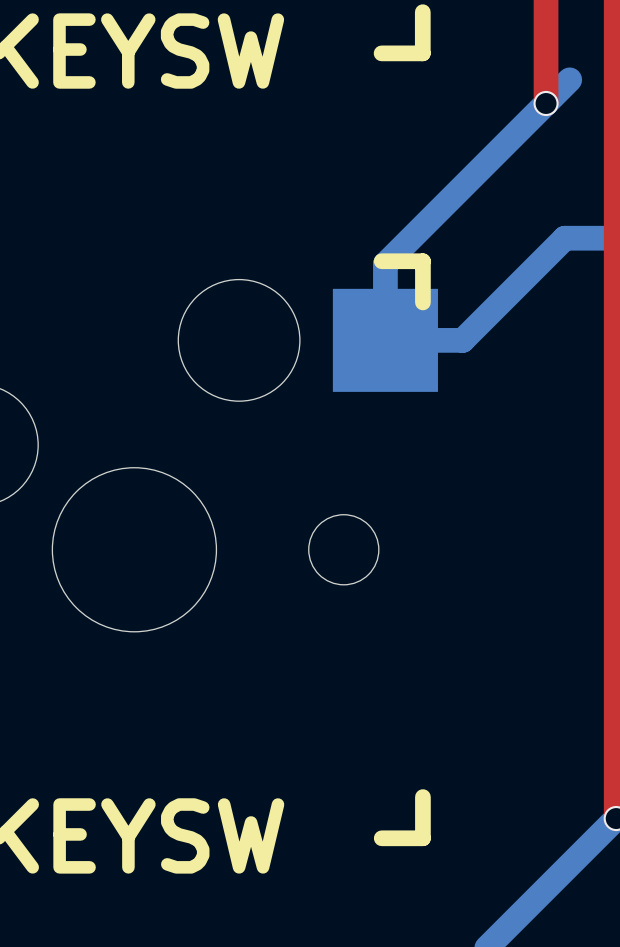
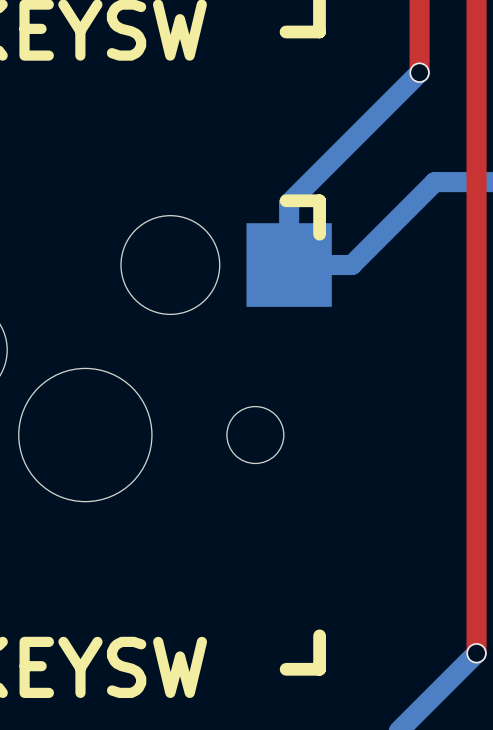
bottom track: (569, 79) (546, 103) -> none

